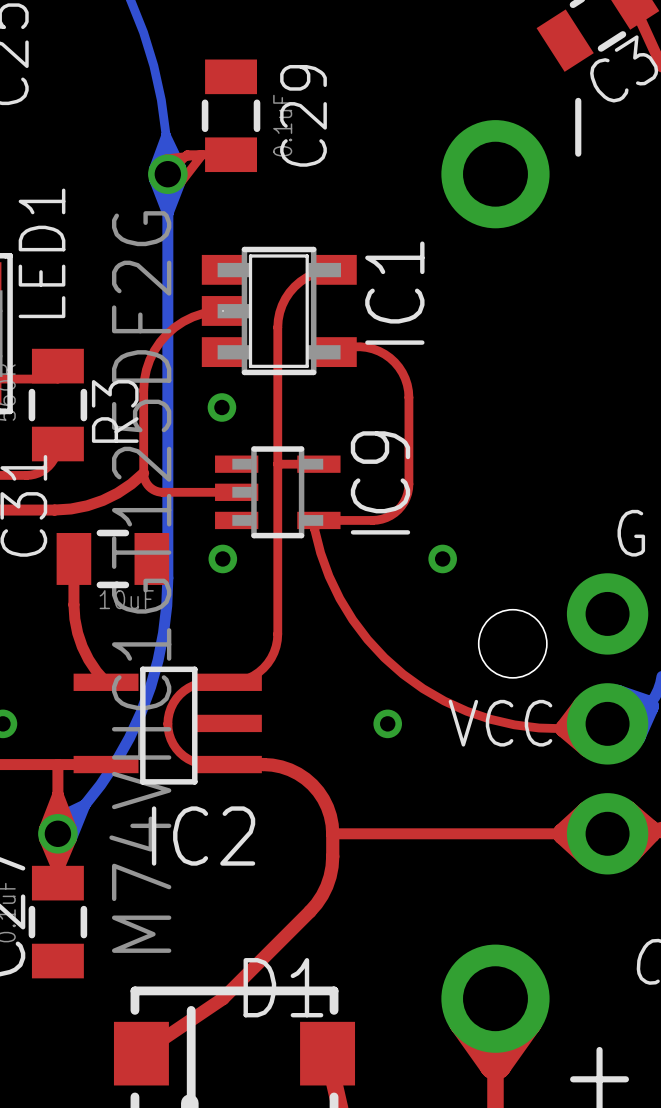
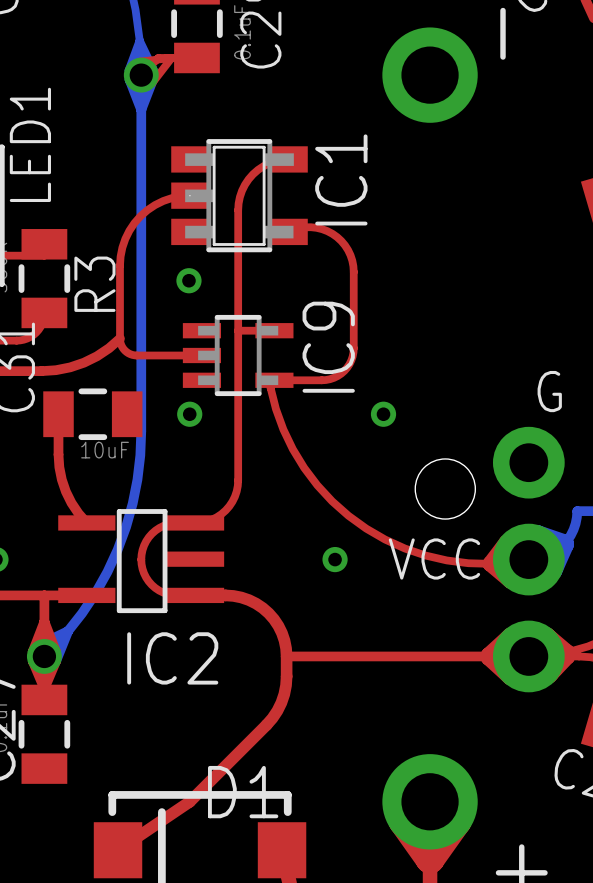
IC1 value: M74VHC1GT125DF2G (140, 582) -> none

